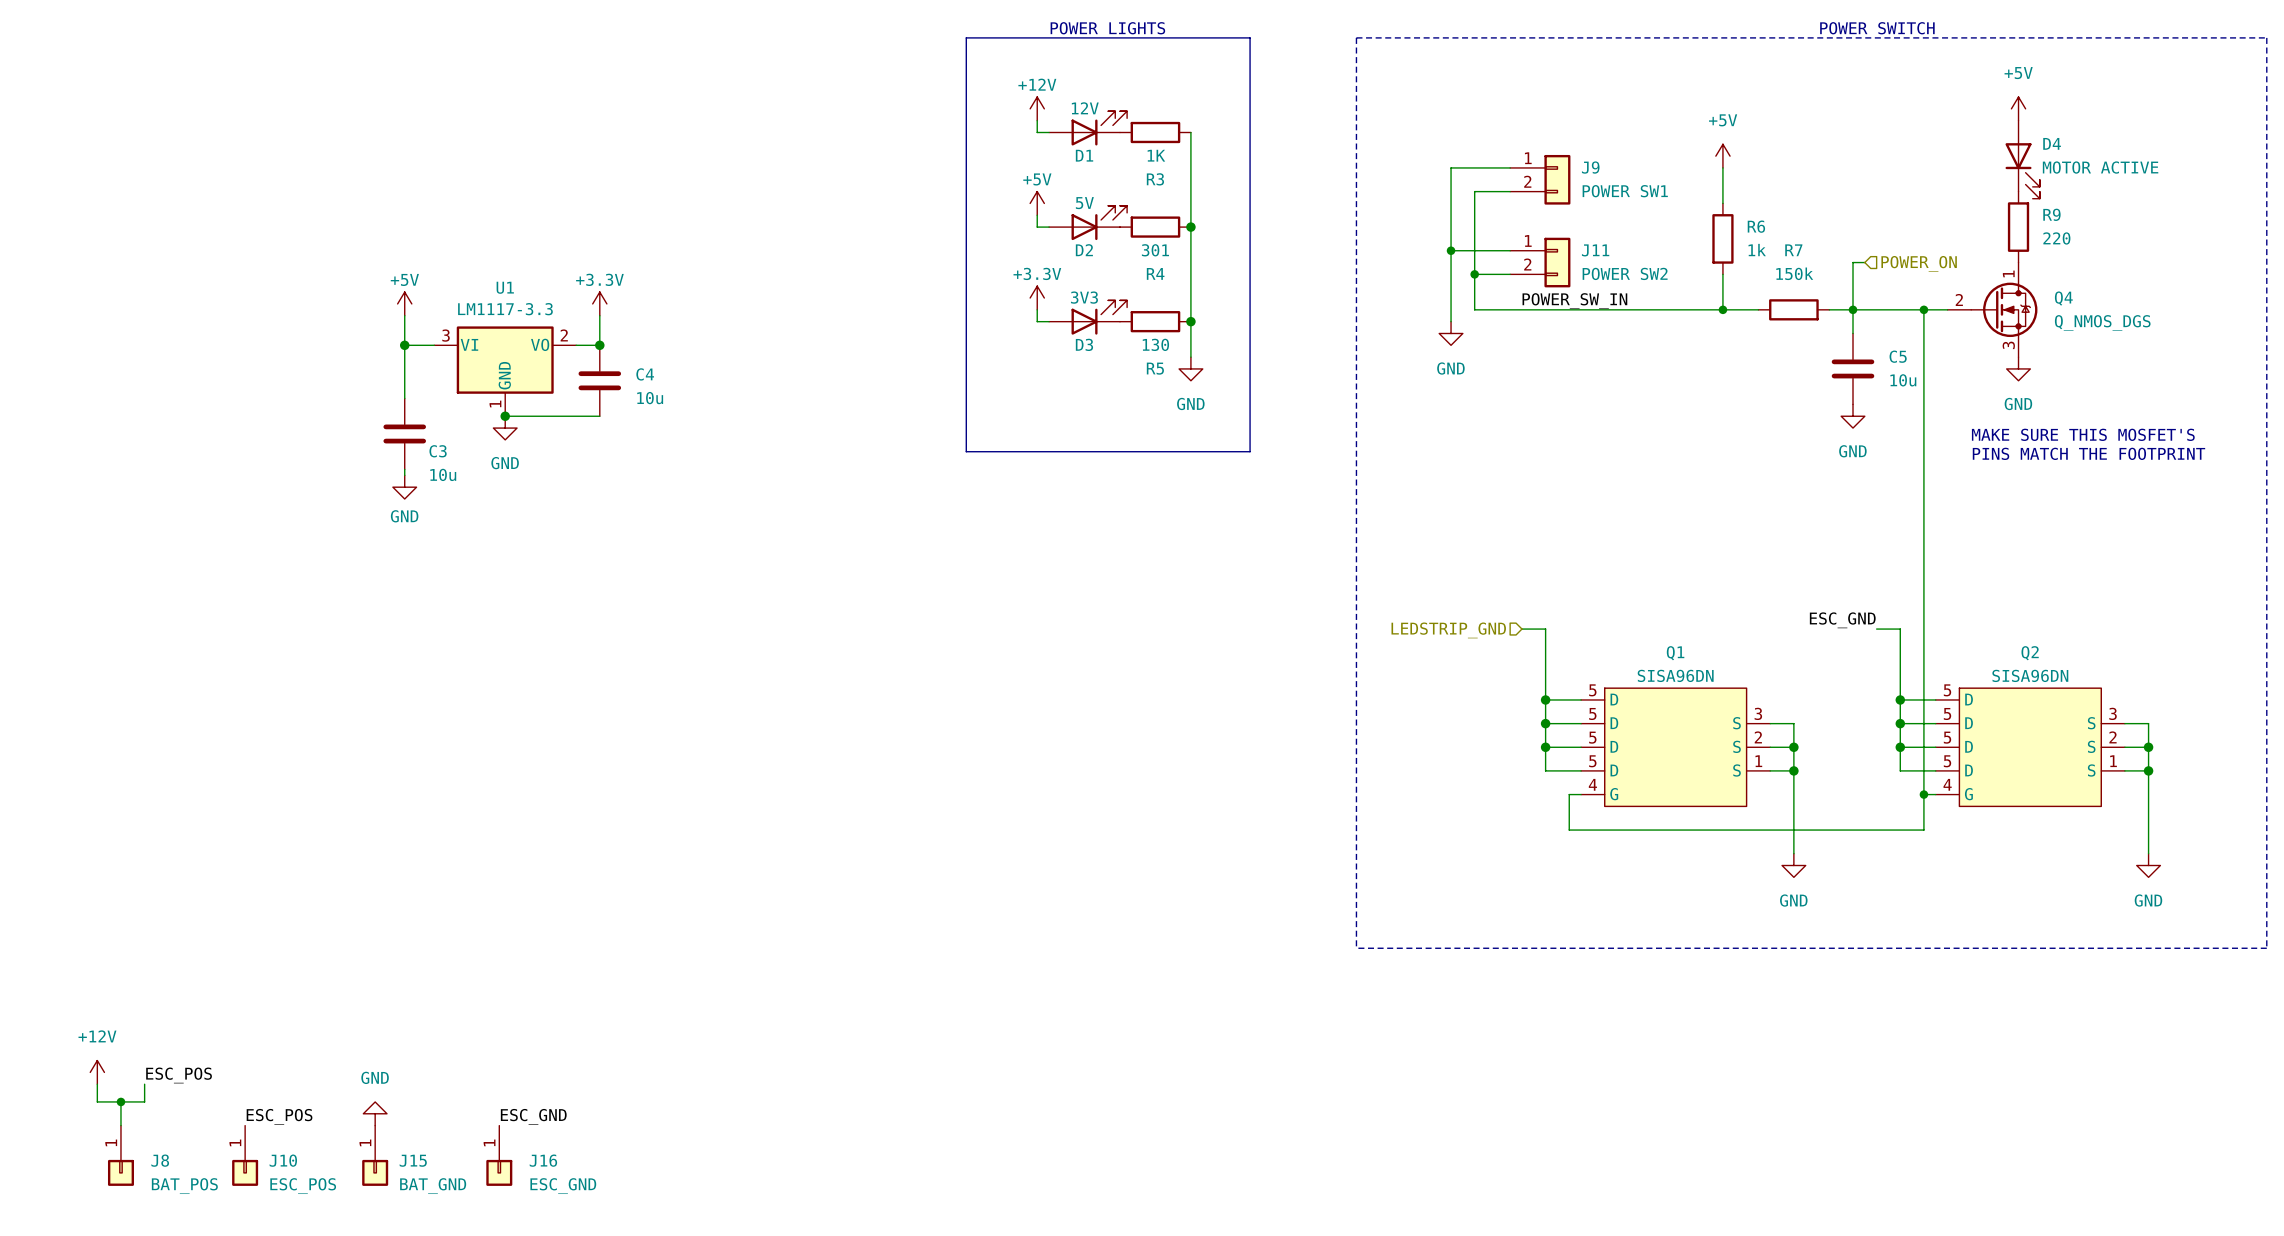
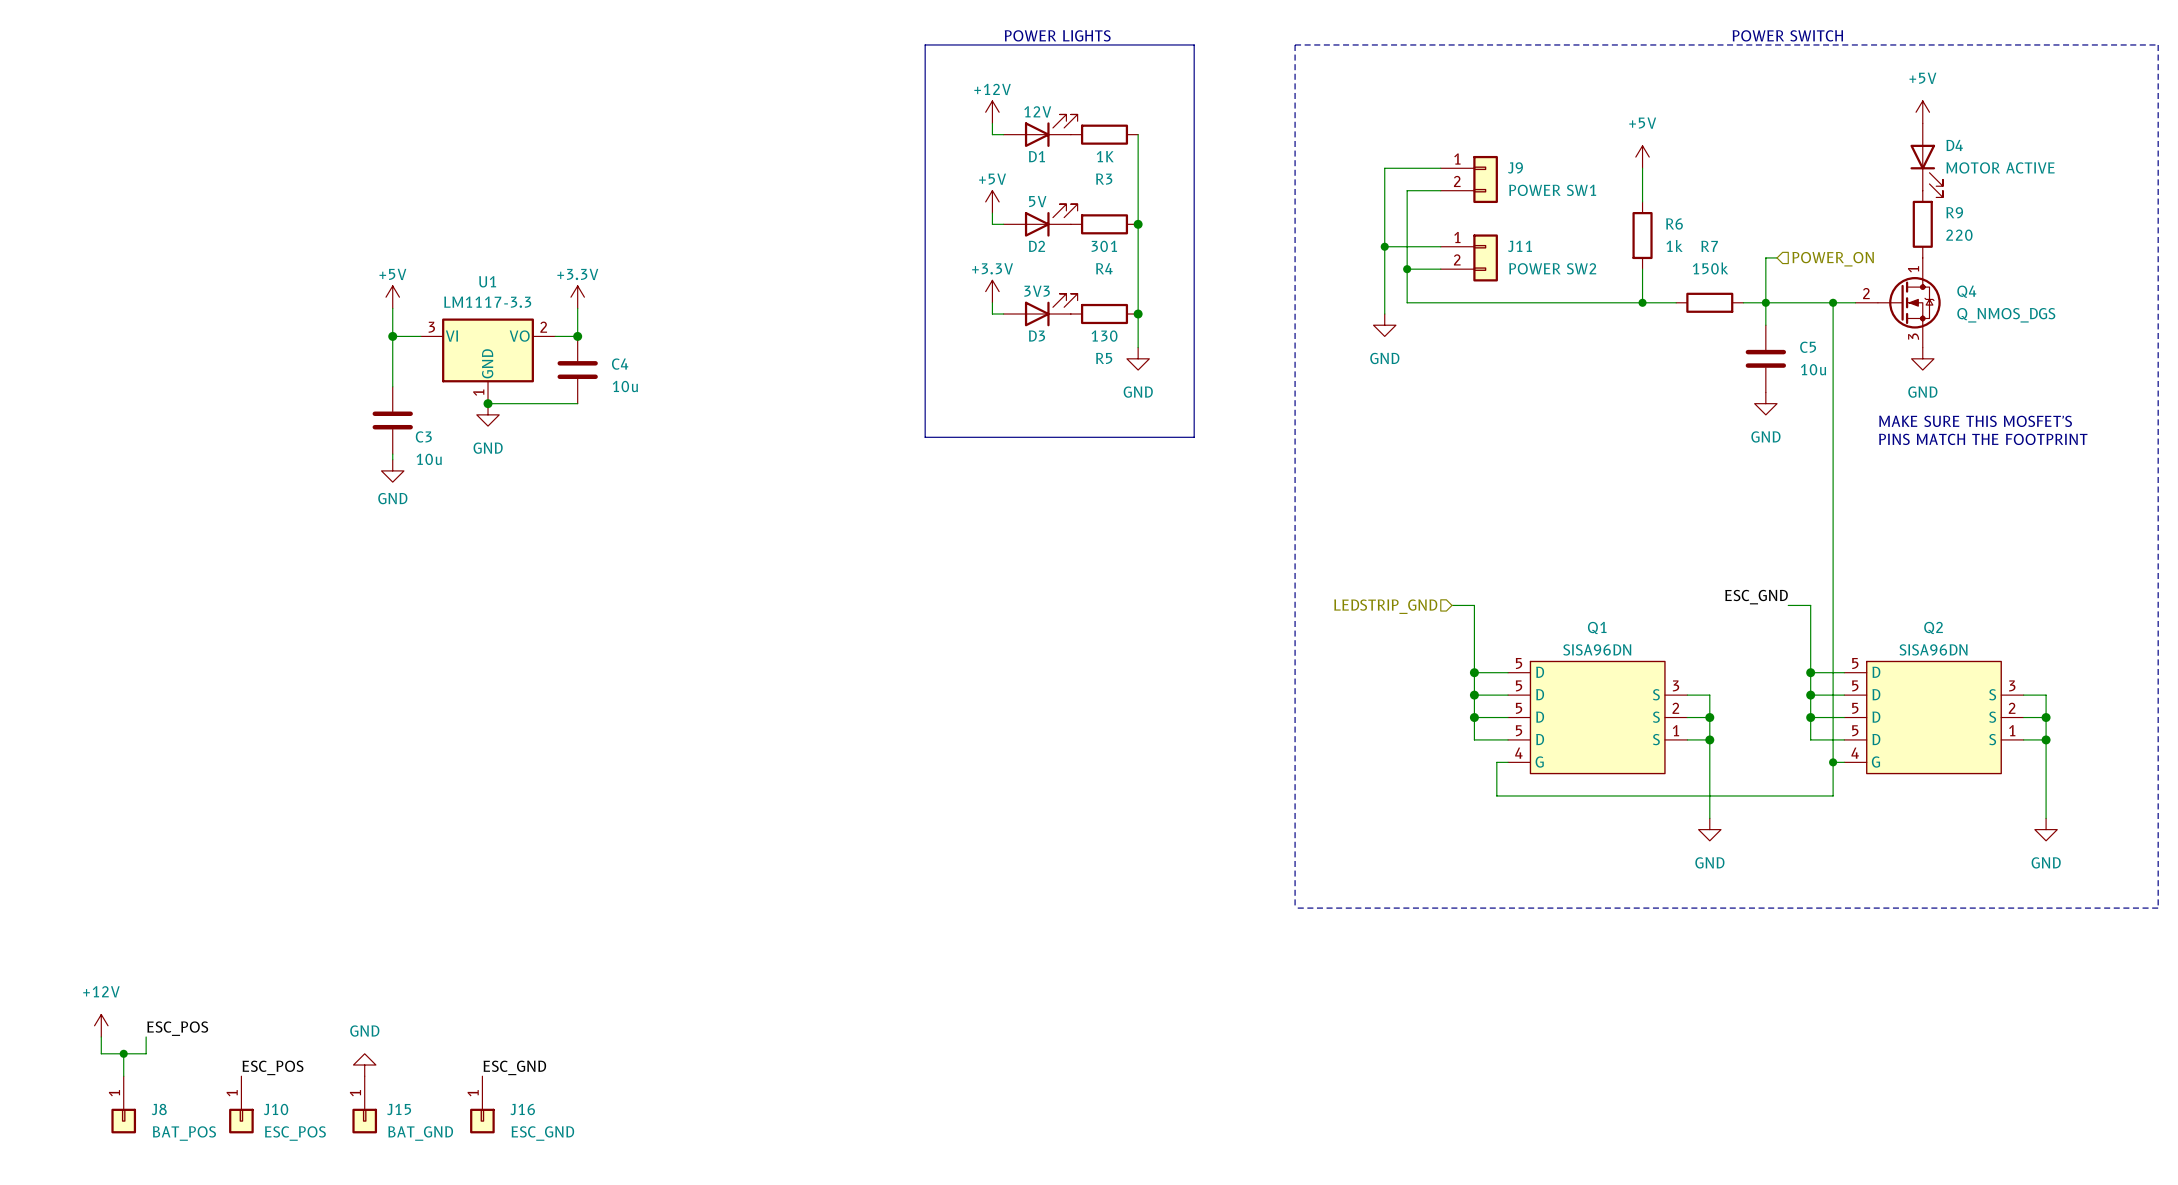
label: POWER_SW_IN (1574, 301) -> none

